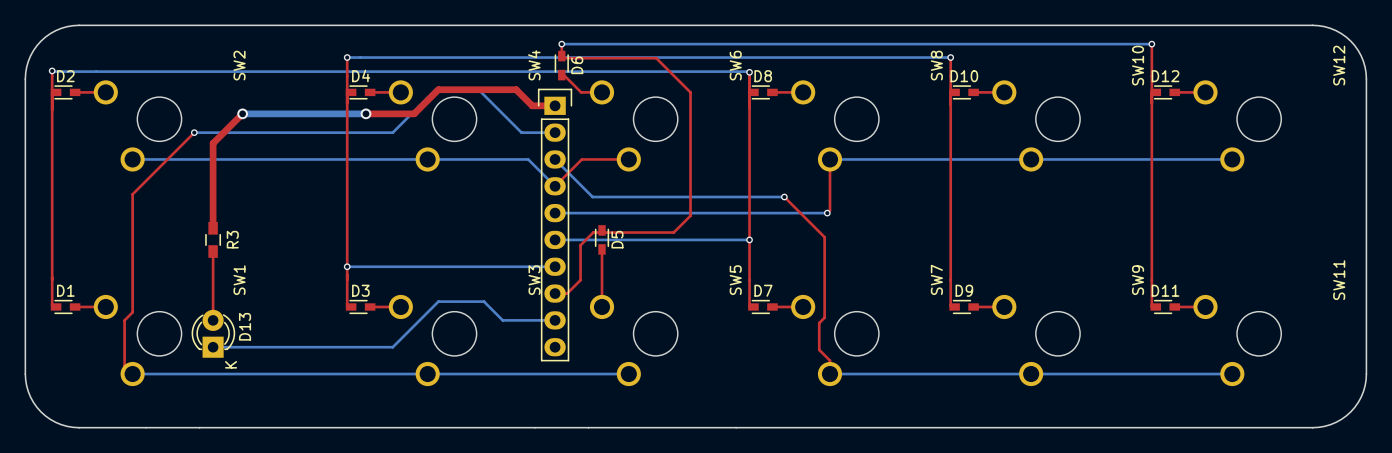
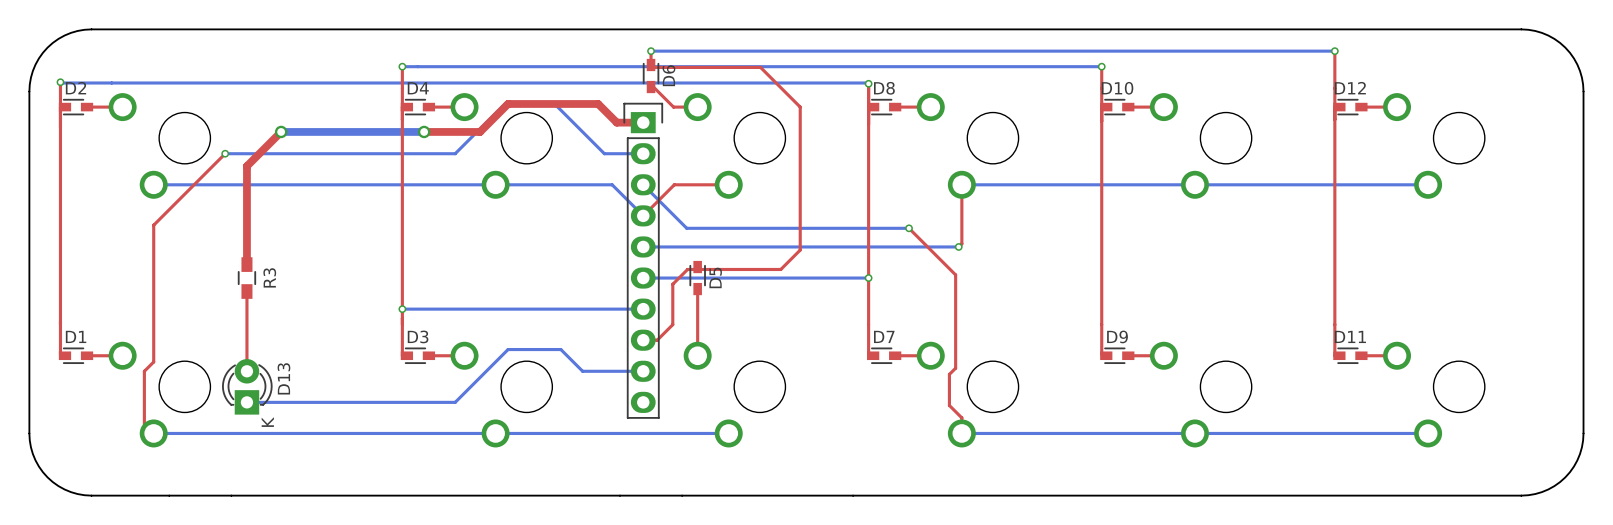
SW2 name: SW2 (239, 65) -> none
SW4 name: SW4 (534, 65) -> none
SW6 name: SW6 (735, 65) -> none
SW8 name: SW8 (936, 65) -> none
SW10 name: SW10 (1138, 65) -> none
SW12 name: SW12 (1339, 65) -> none
SW7 name: SW7 (936, 279) -> none
SW1 name: SW1 (239, 280) -> none
SW3 name: SW3 (534, 280) -> none
SW5 name: SW5 (735, 280) -> none
SW9 name: SW9 (1138, 280) -> none
SW11 name: SW11 (1339, 280) -> none

